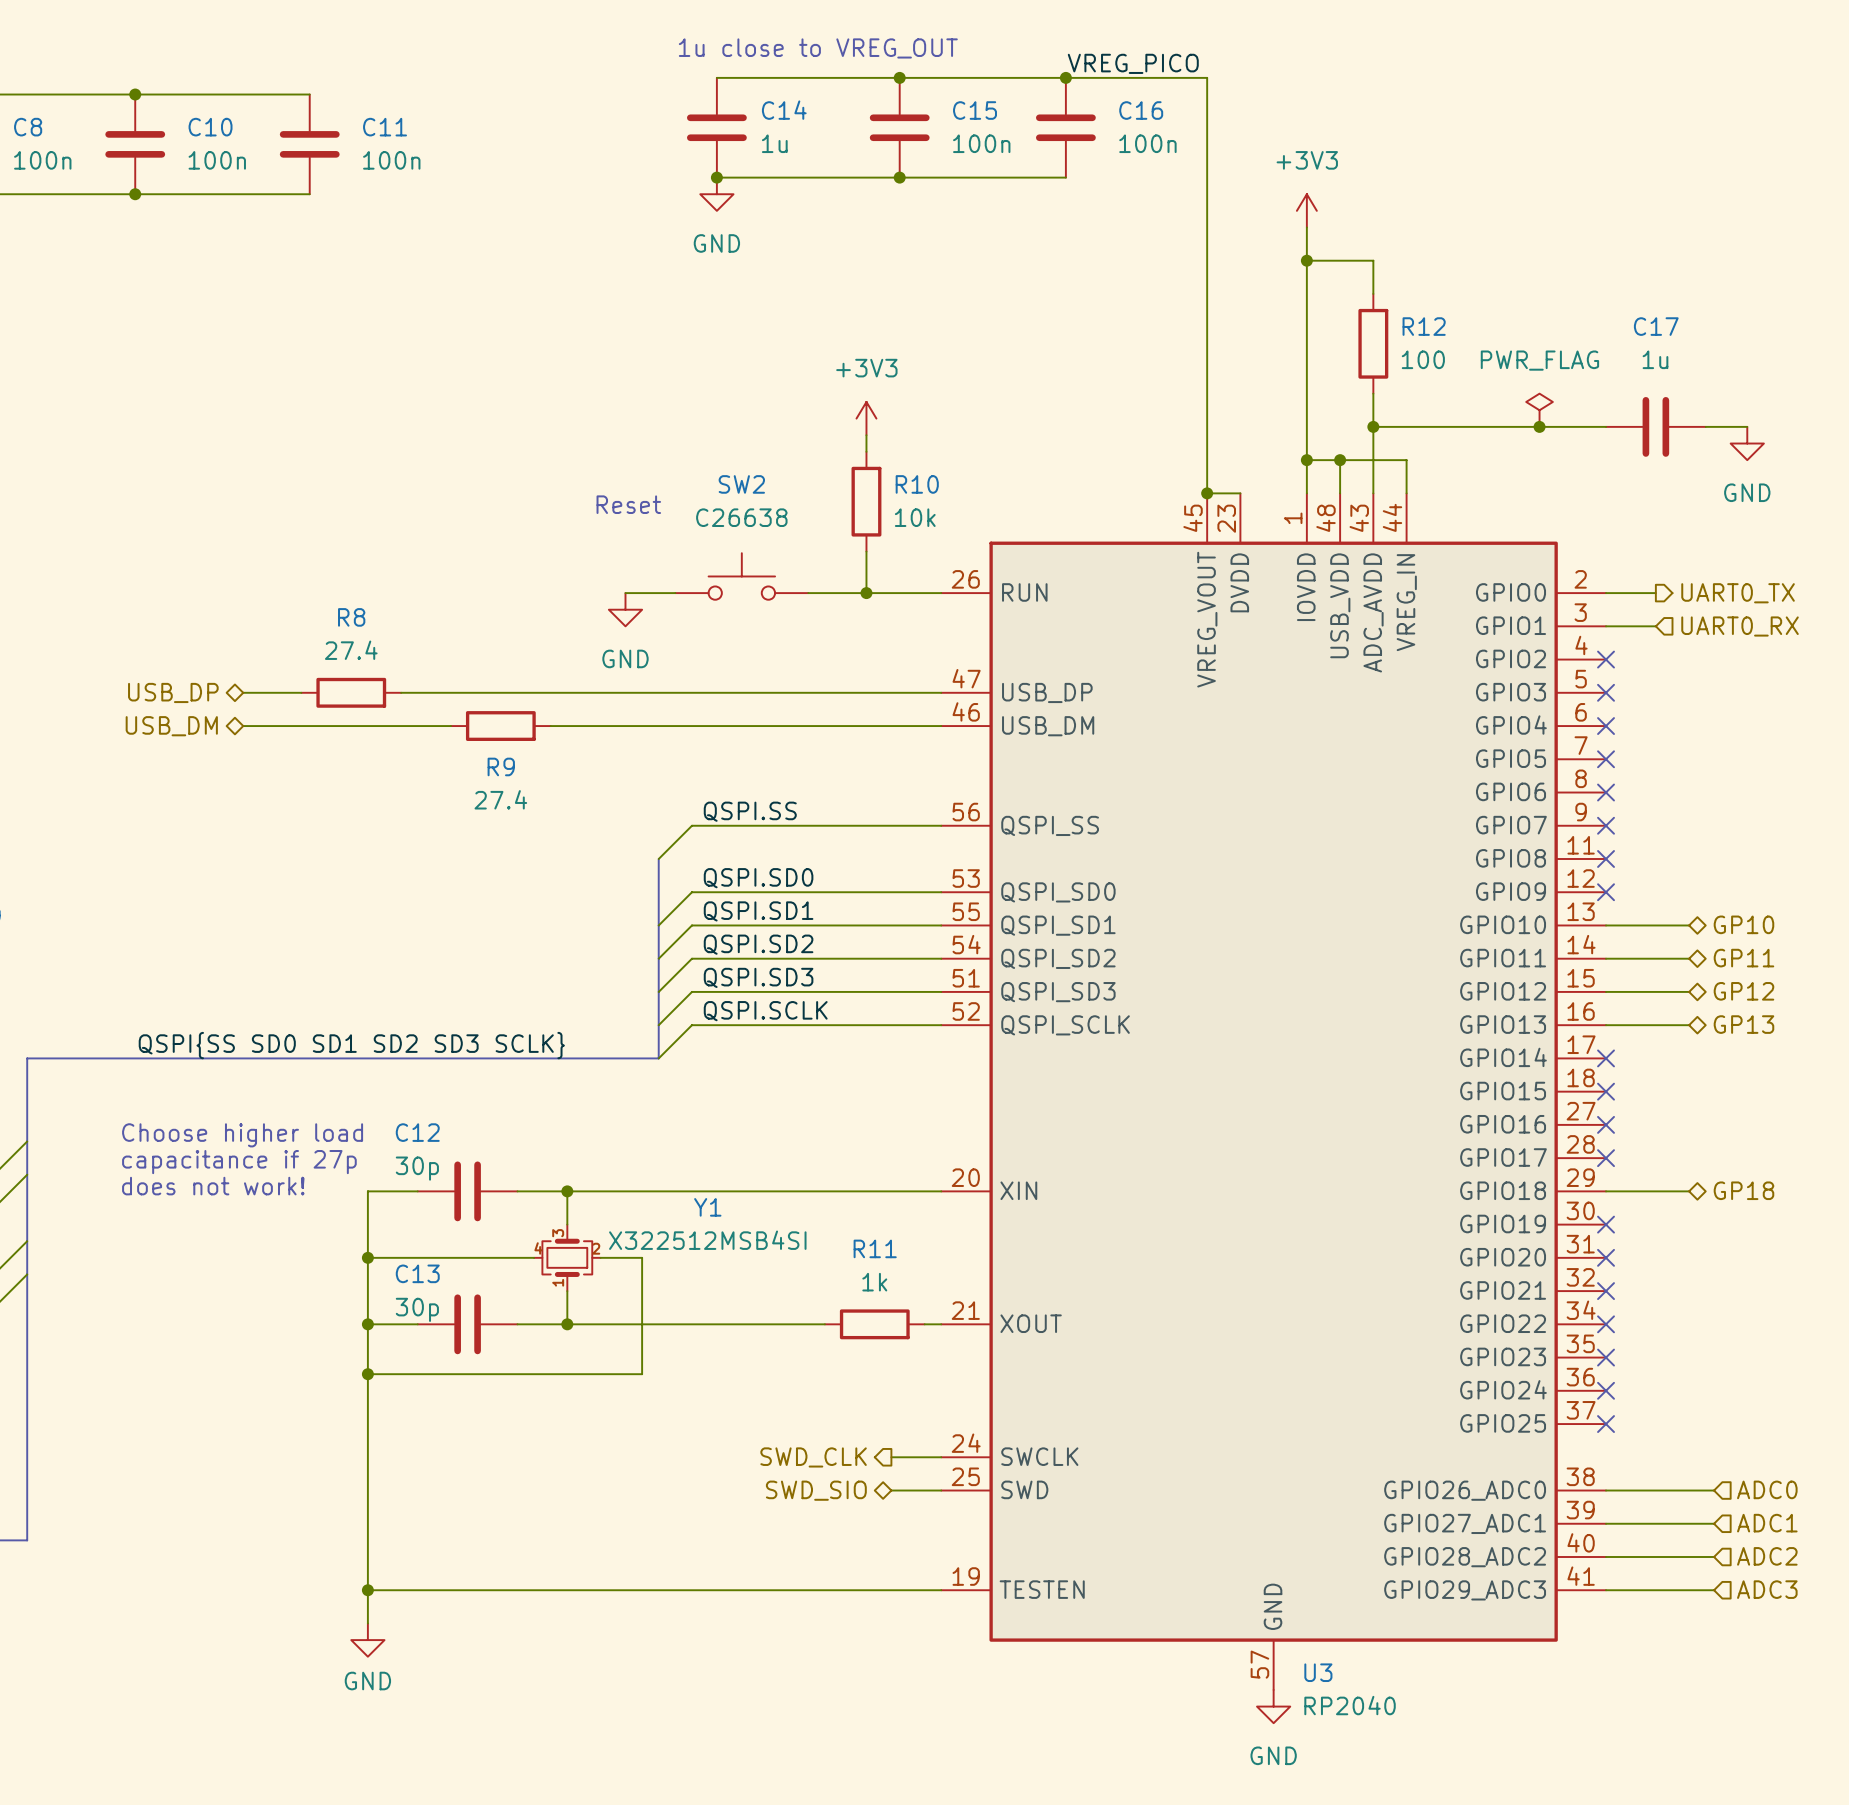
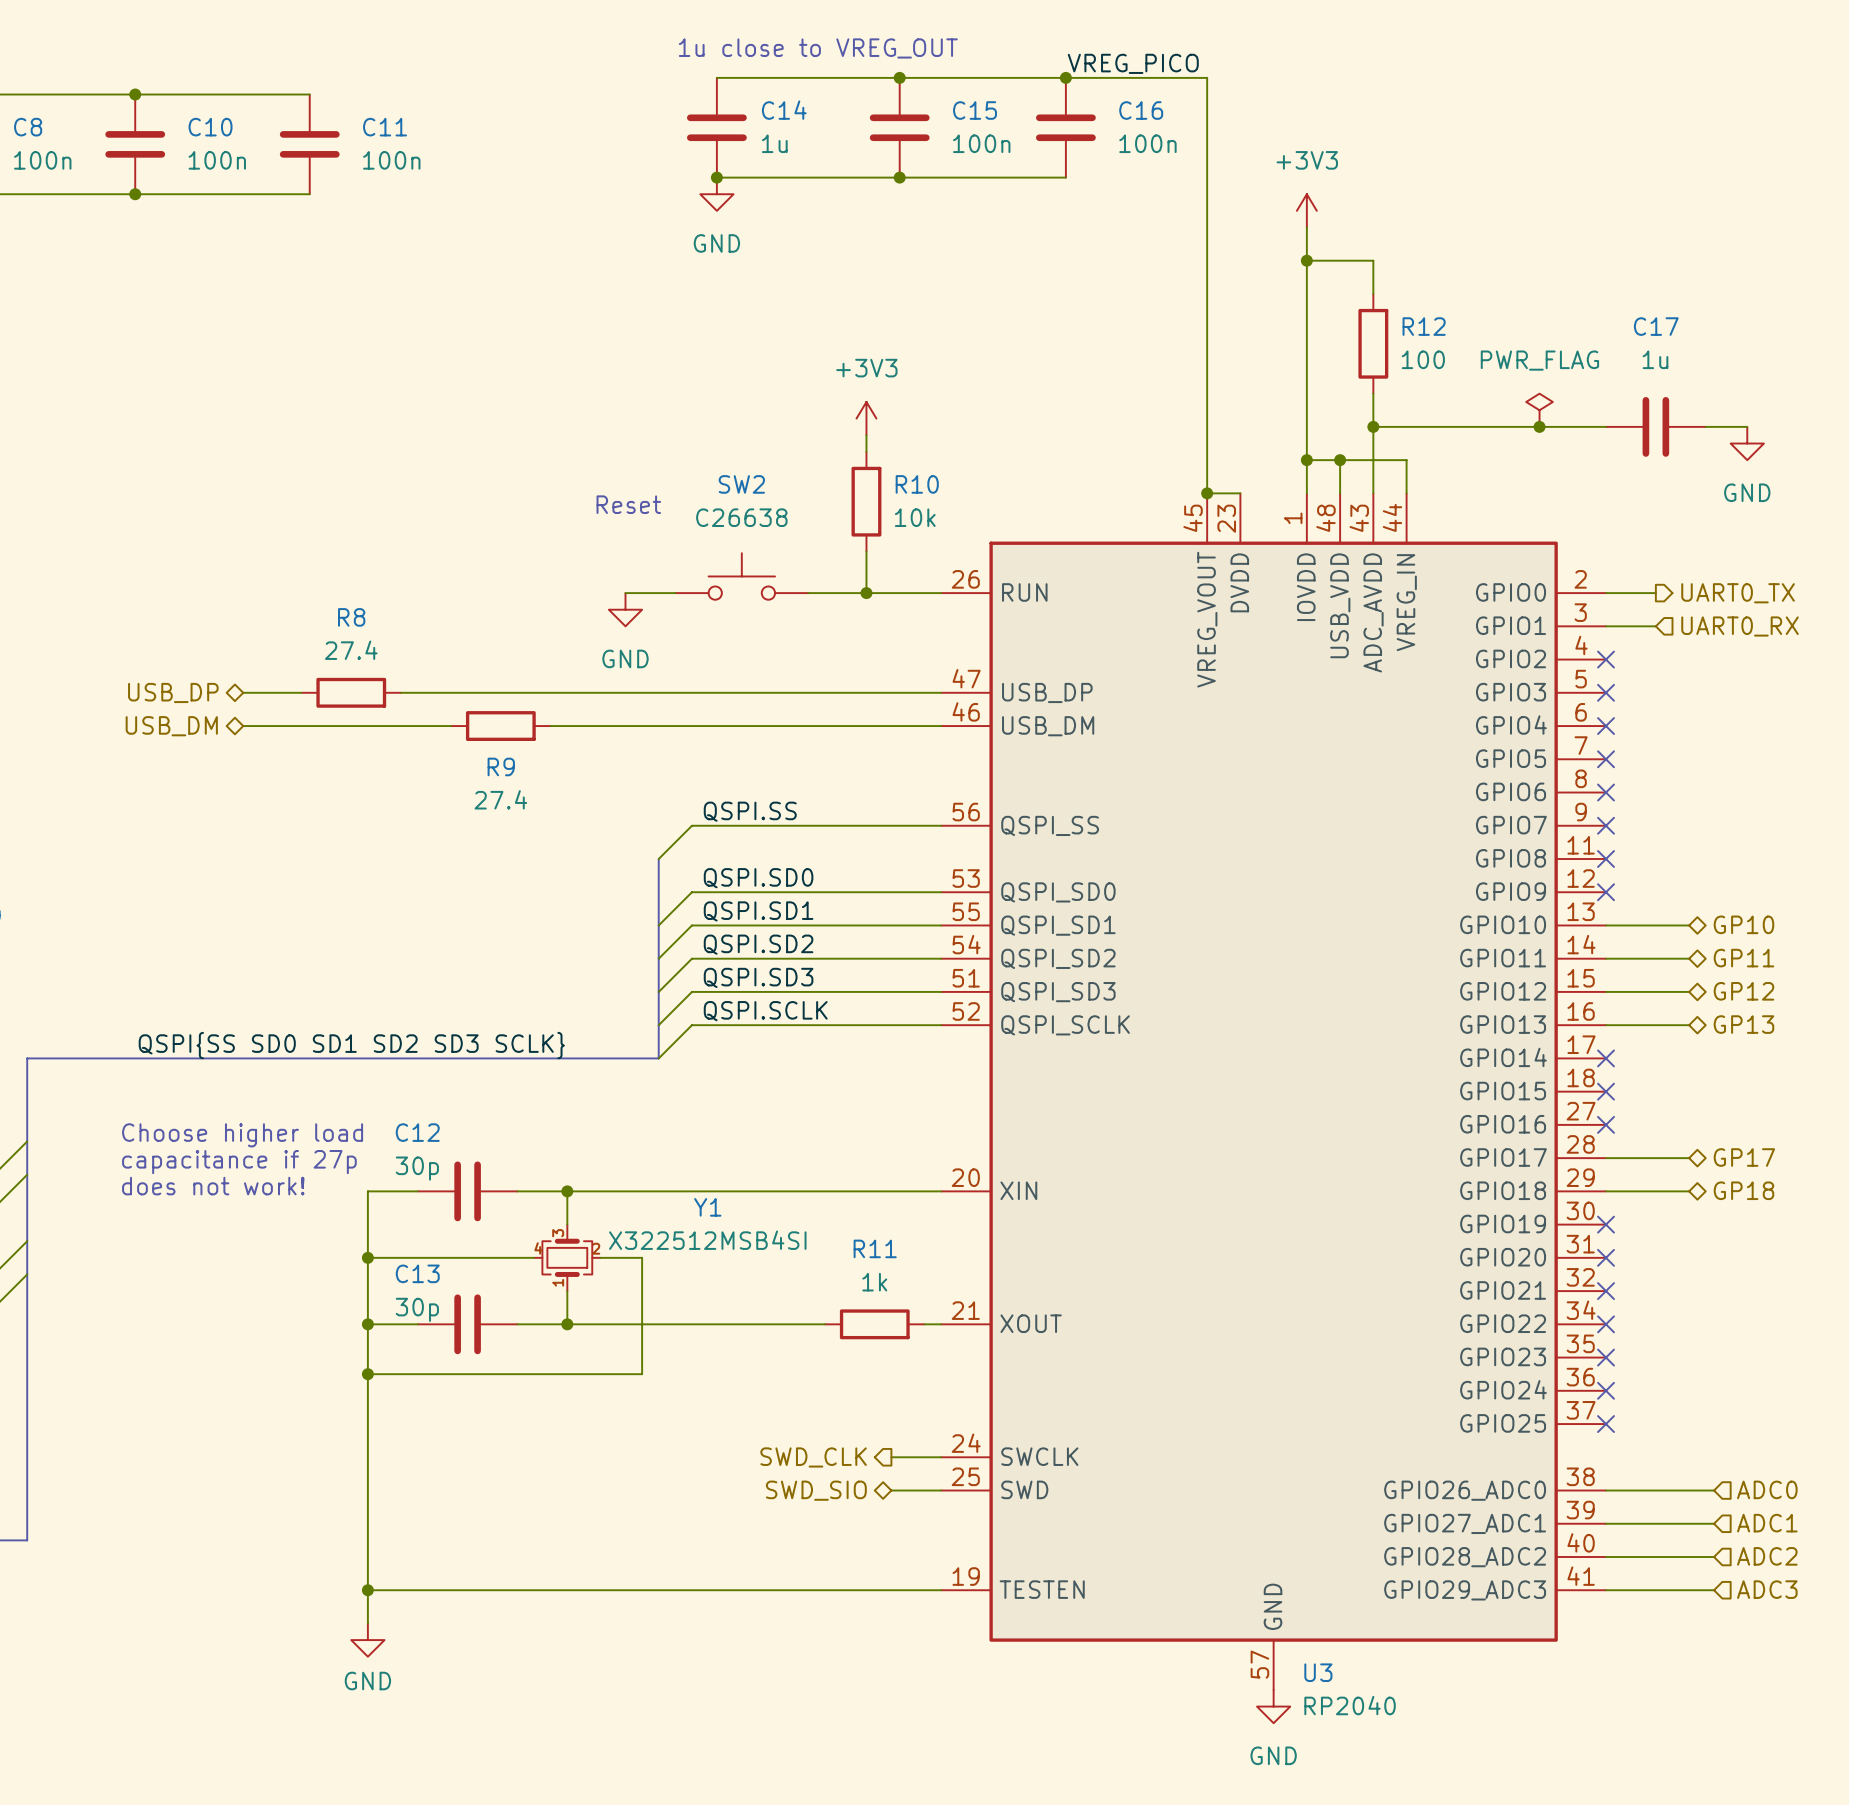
hierarchical label: none -> GP17 (1744, 1157)
wire: none -> (1606, 1158) (1689, 1158)
no-connect mark: (1606, 1158) -> none

